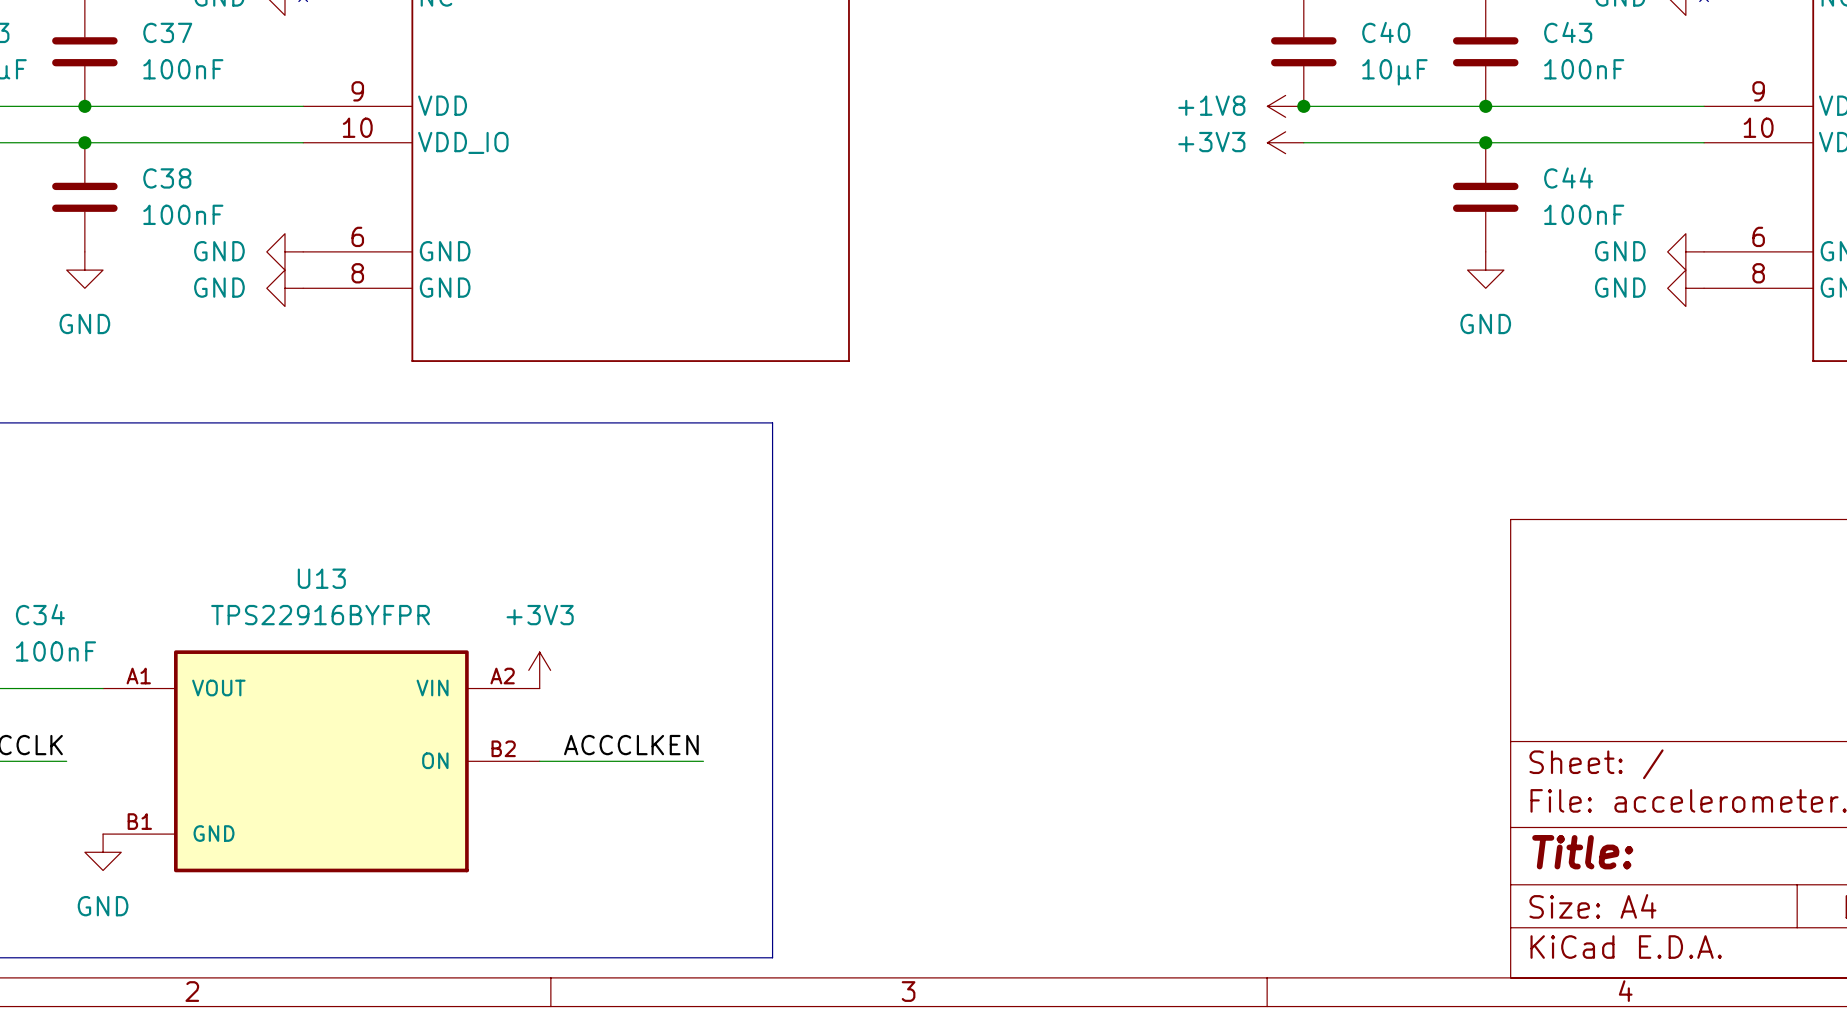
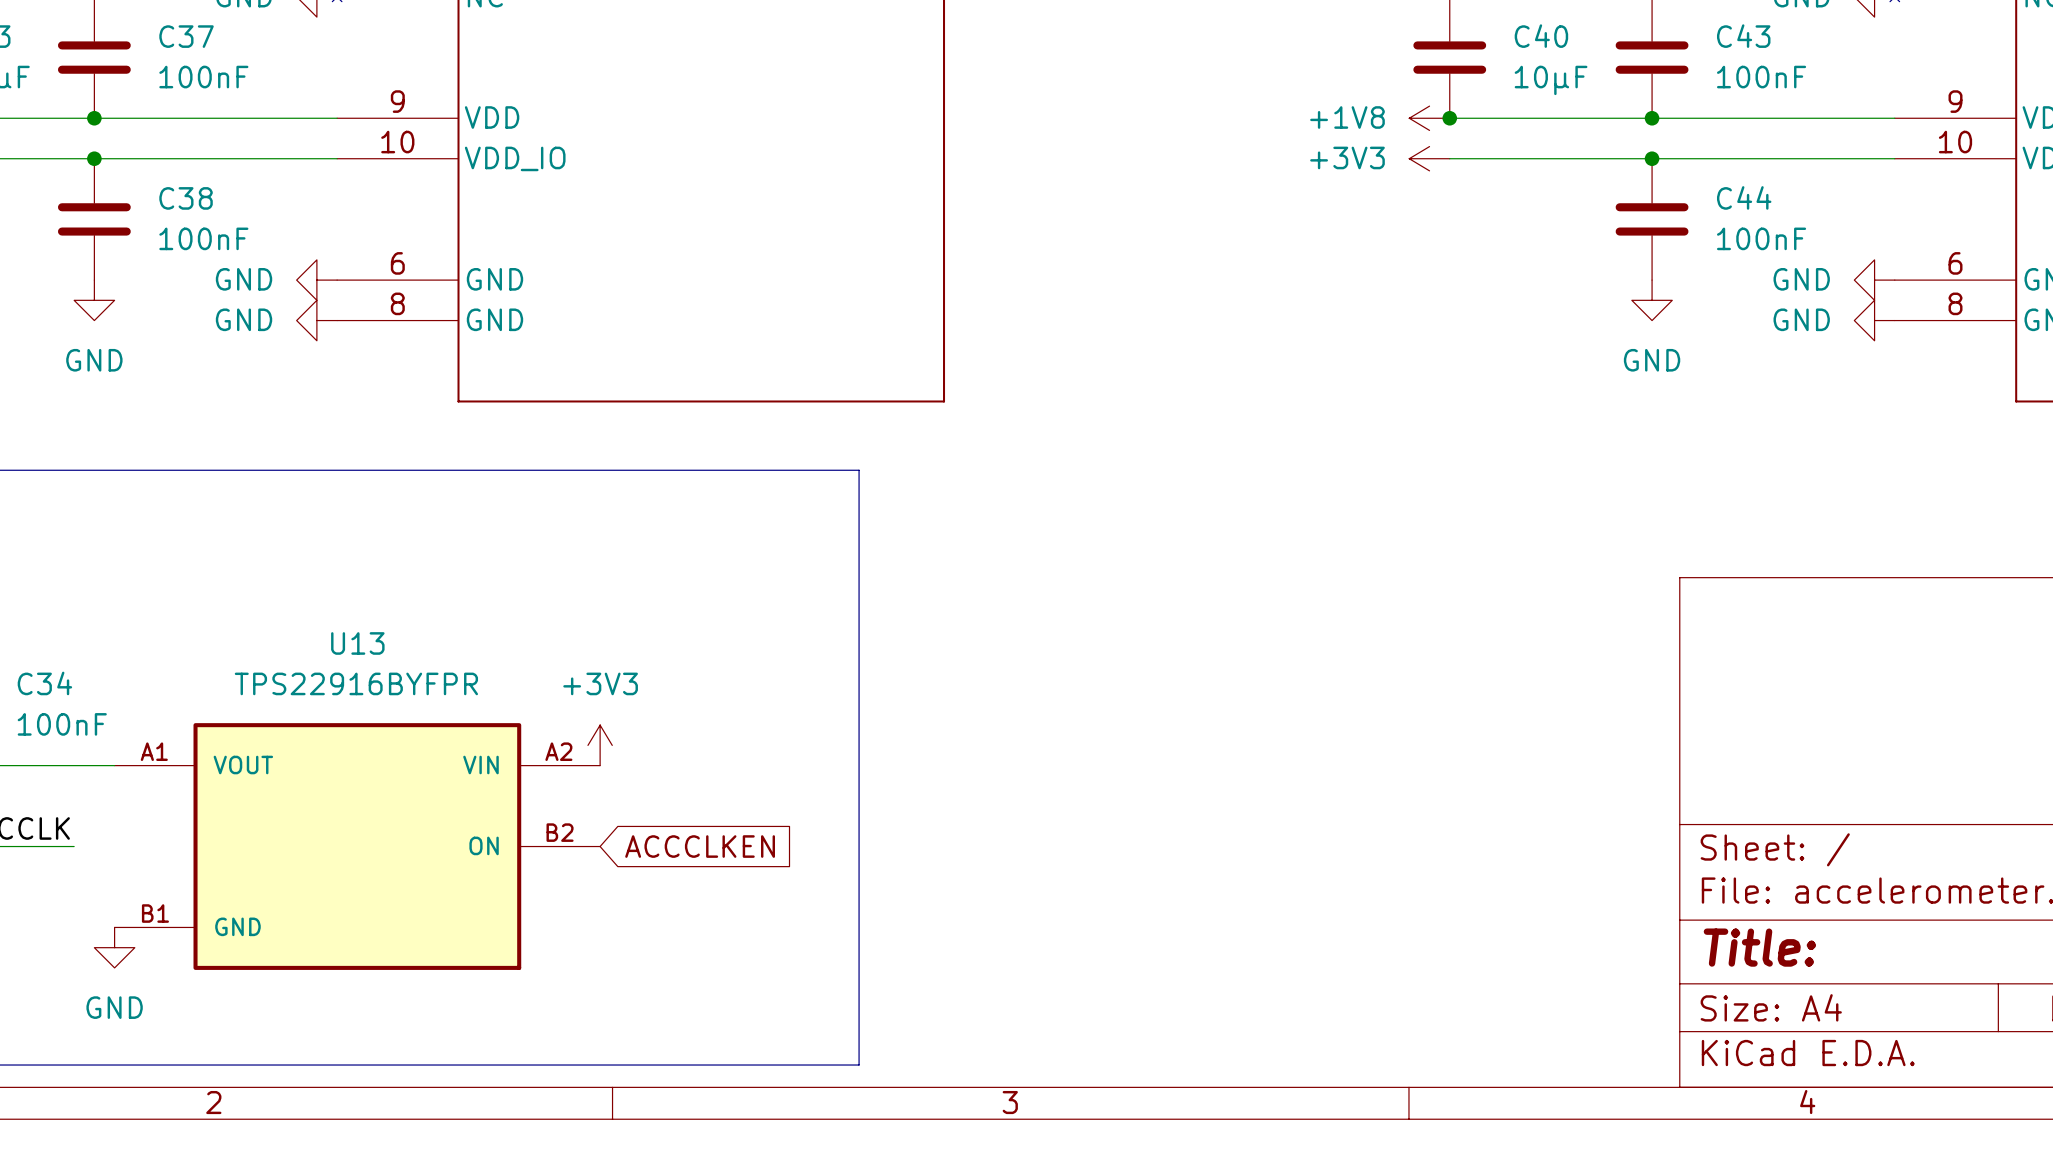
label: ACCCLKEN (631, 745) -> none
wire: (539, 761) (703, 761) -> none
global label: none -> ACCCLKEN (700, 846)

